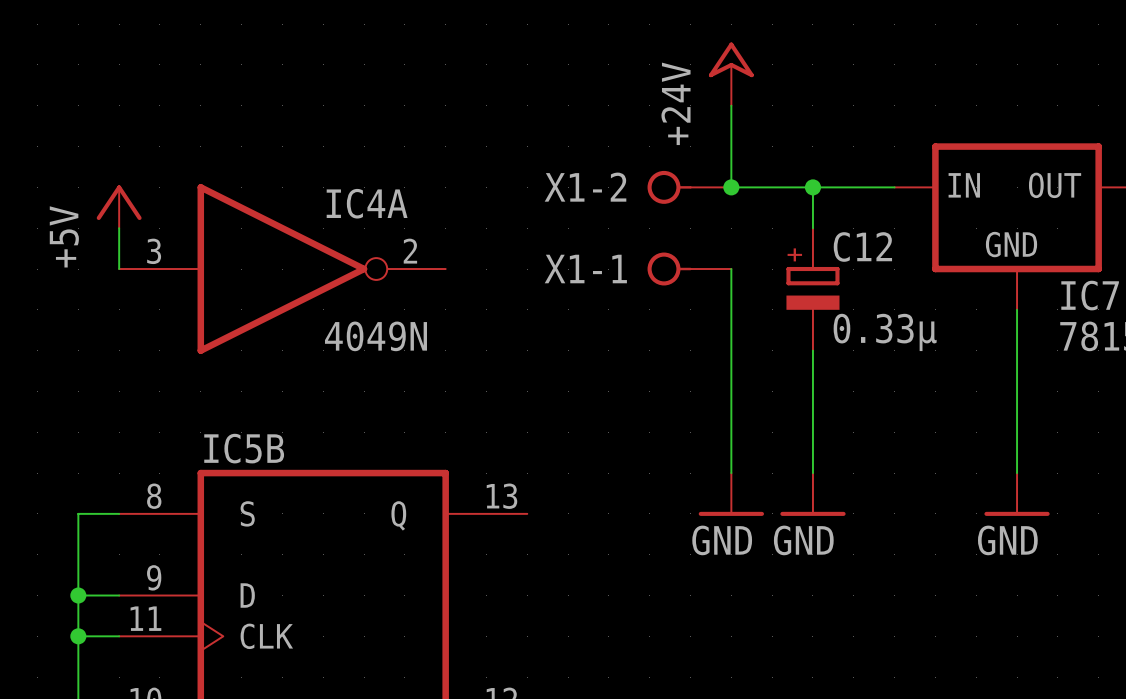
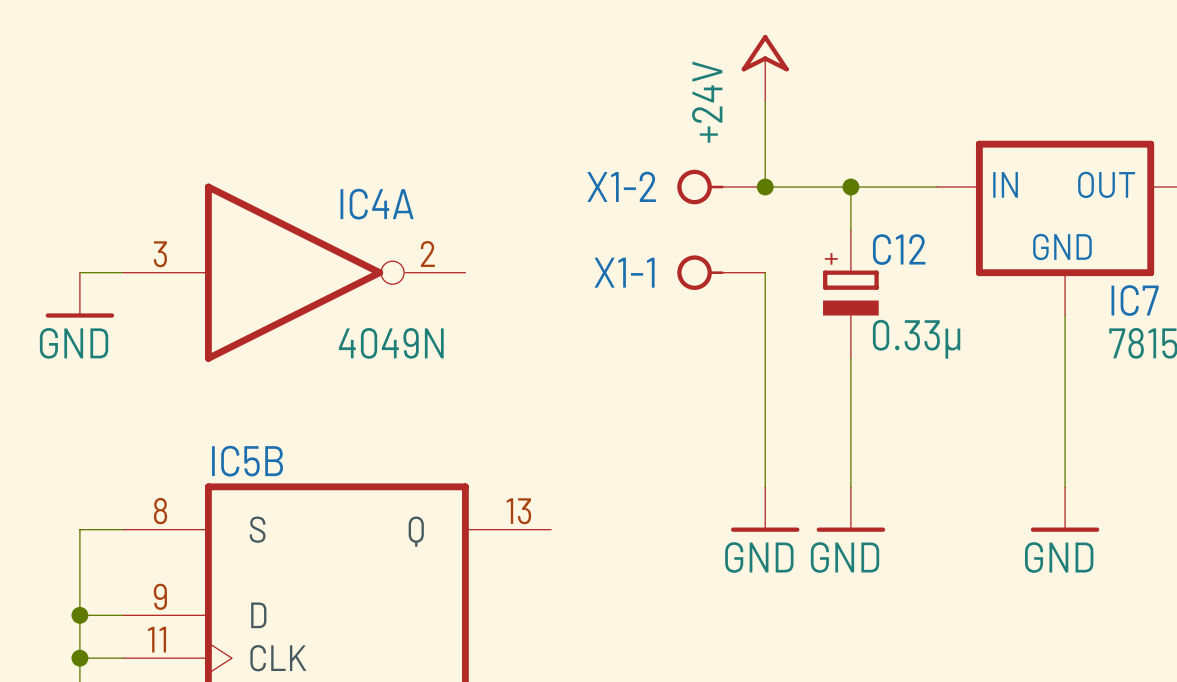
power symbol: +5V (119, 206) -> none
wire: (119, 228) (119, 269) -> (79, 272) (122, 272)
power symbol: none -> GND (79, 295)

